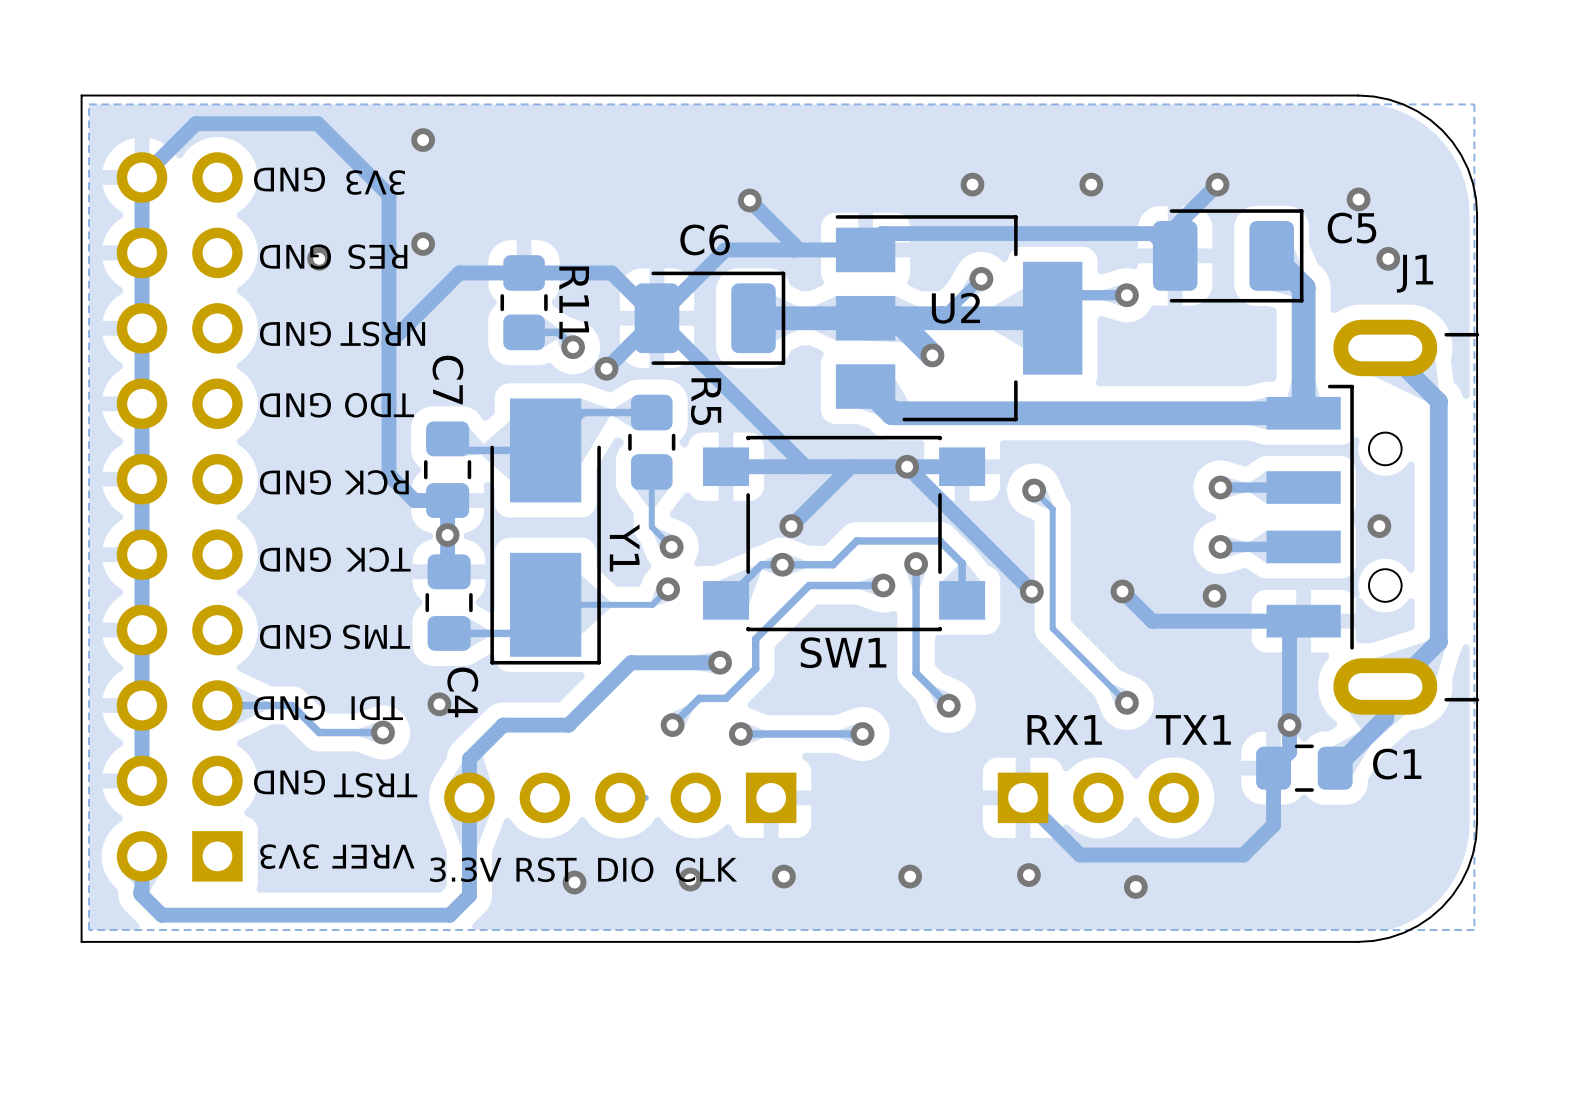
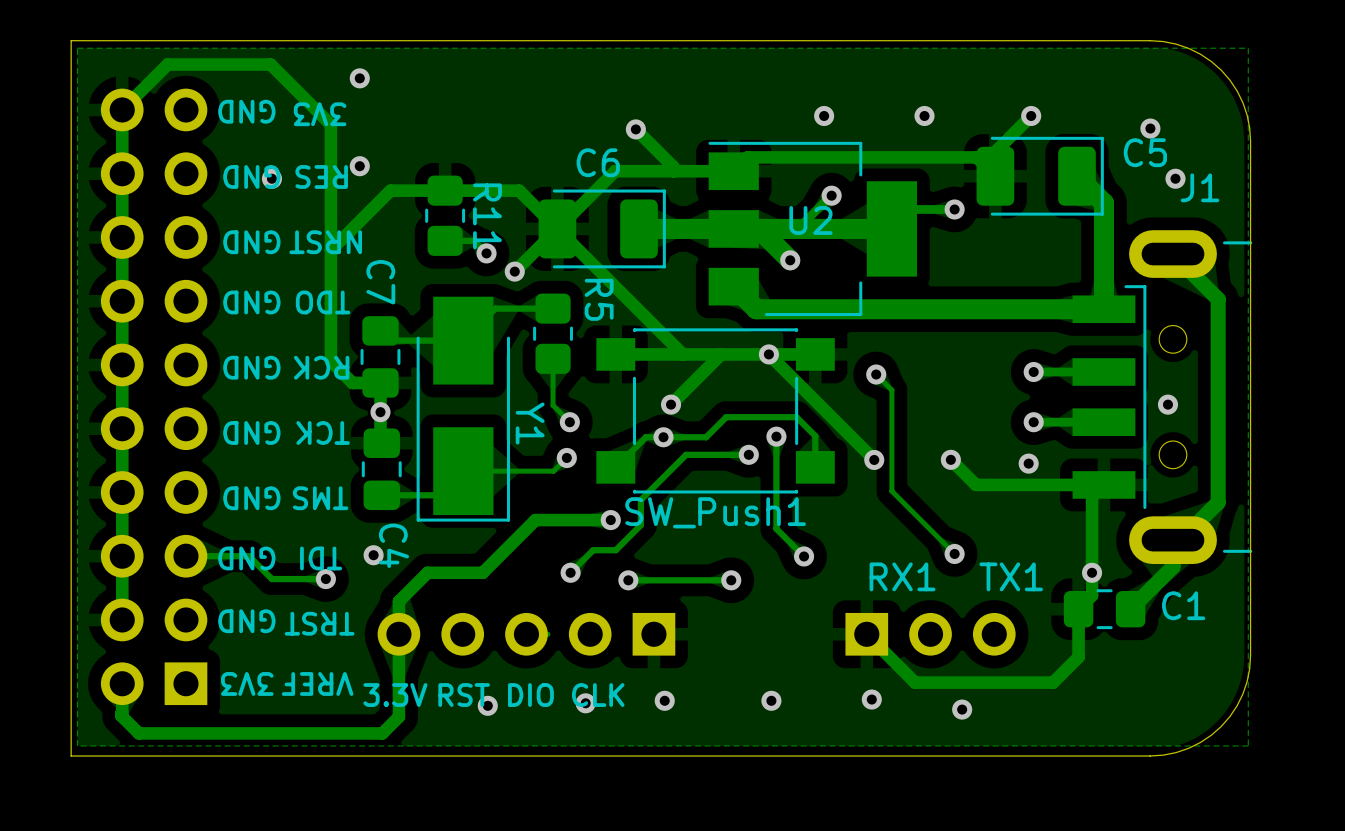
SW1 name: SW1 (843, 652) -> SW_Push1 (715, 512)

